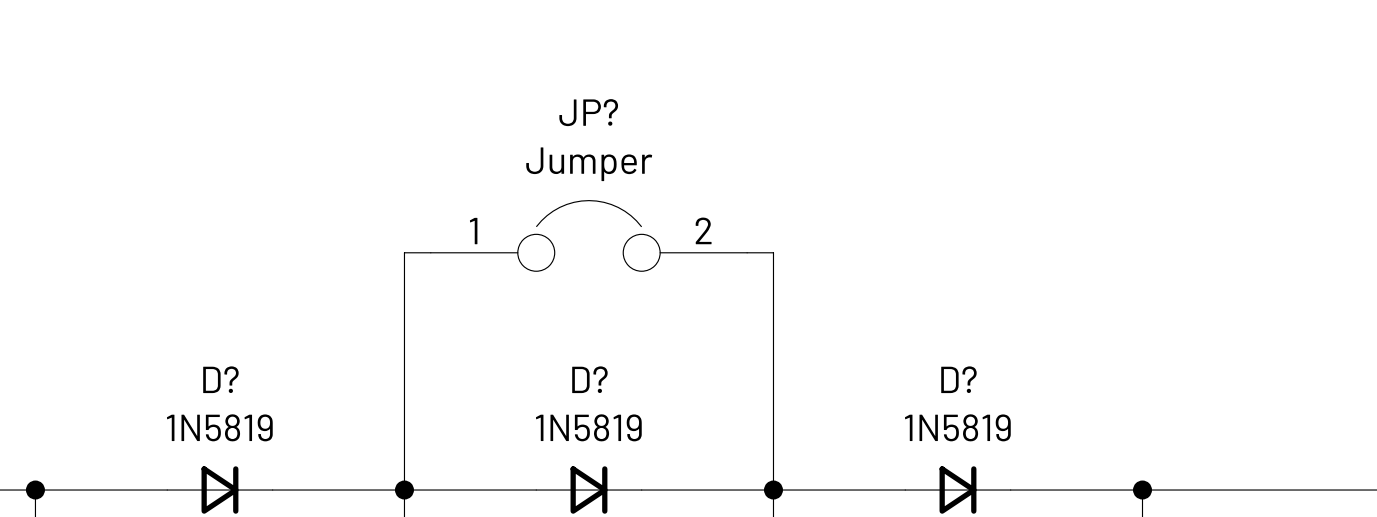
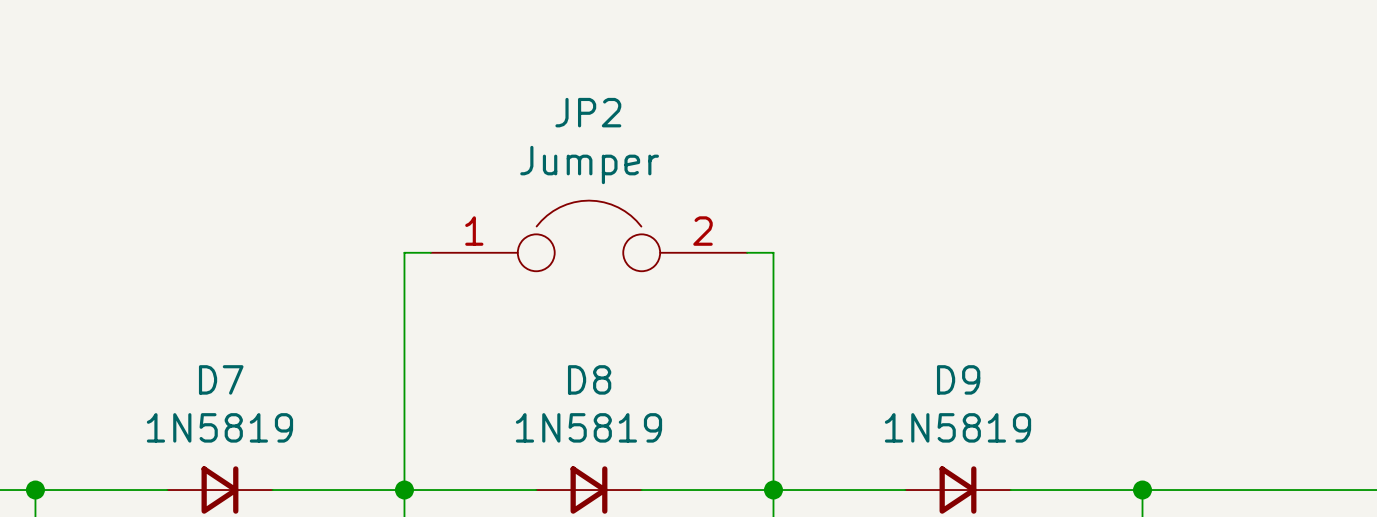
JP? name: JP? (588, 112) -> JP2 (588, 112)
D? name: D? (220, 379) -> D7 (221, 379)
D? name: D? (589, 379) -> D8 (589, 379)
D? name: D? (958, 379) -> D9 (958, 379)

